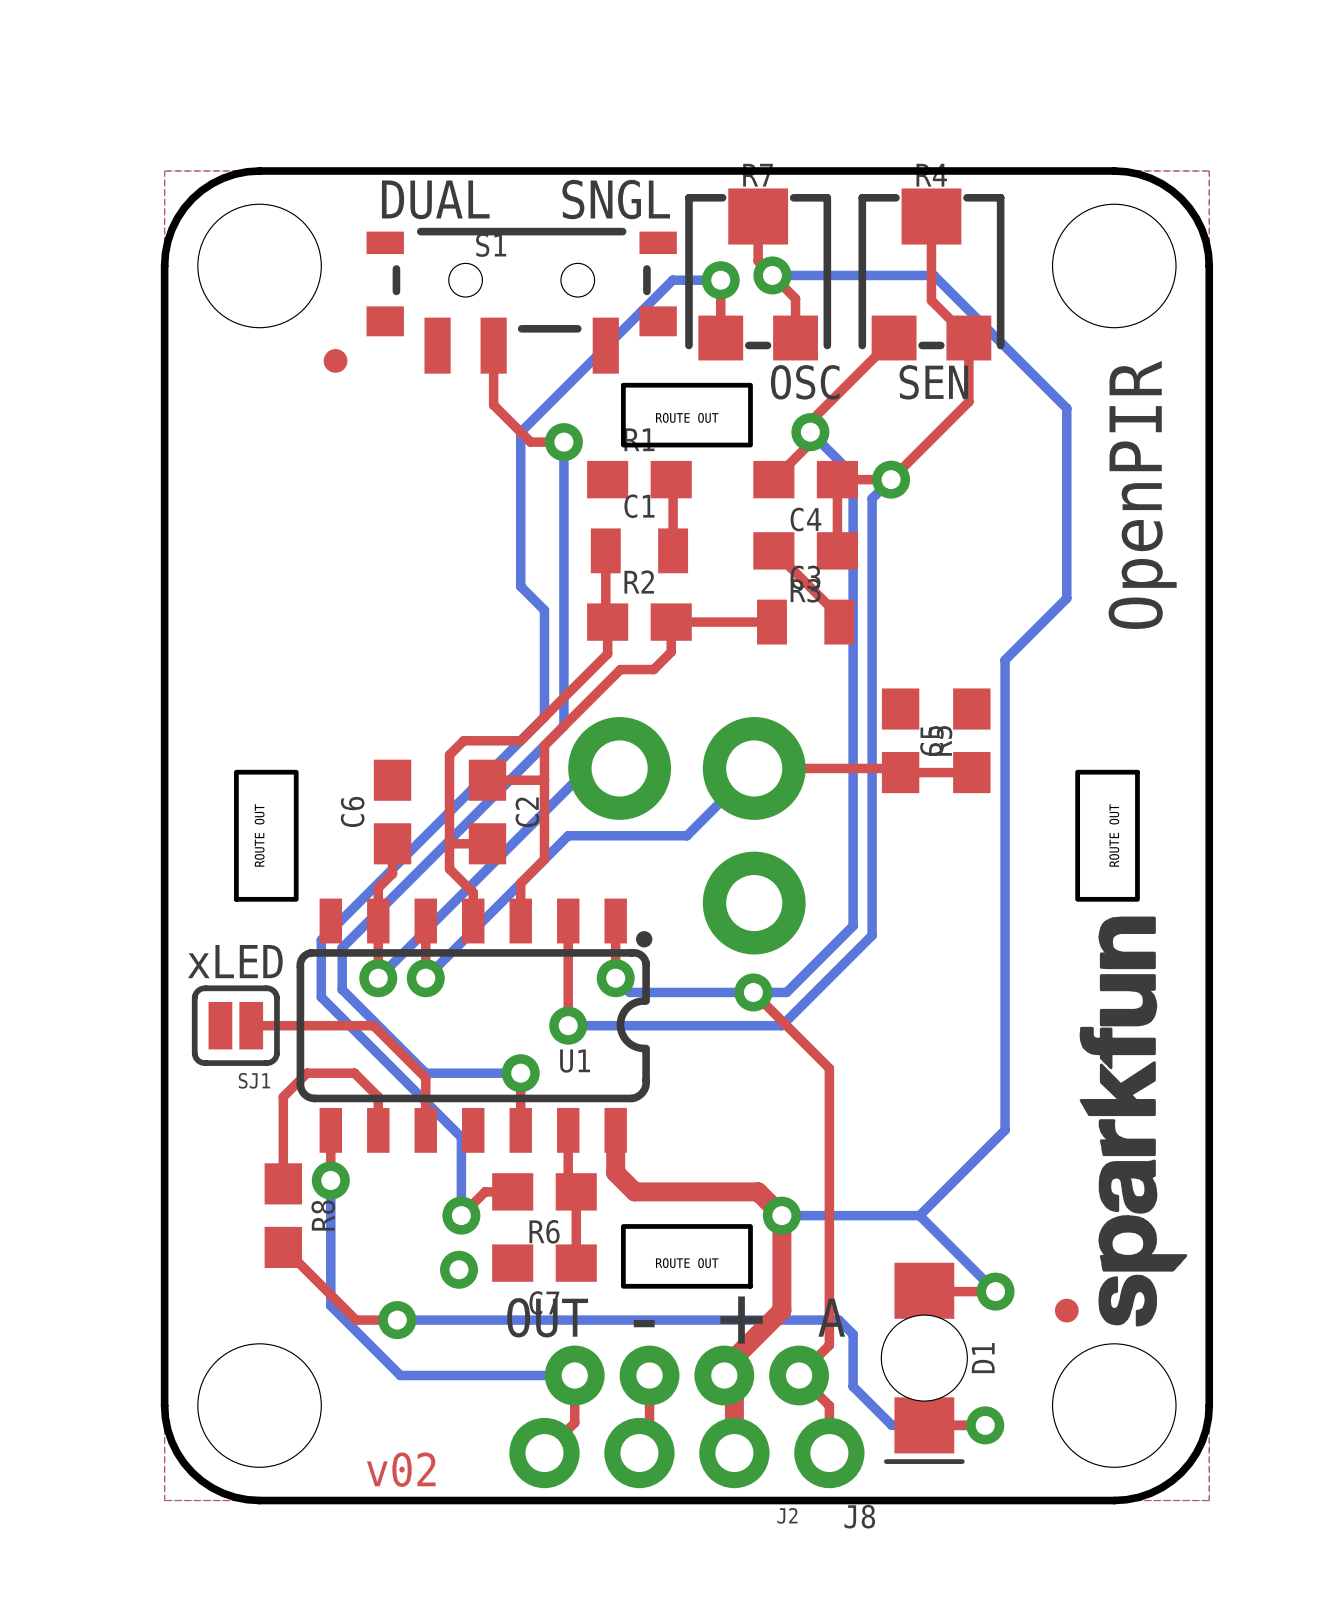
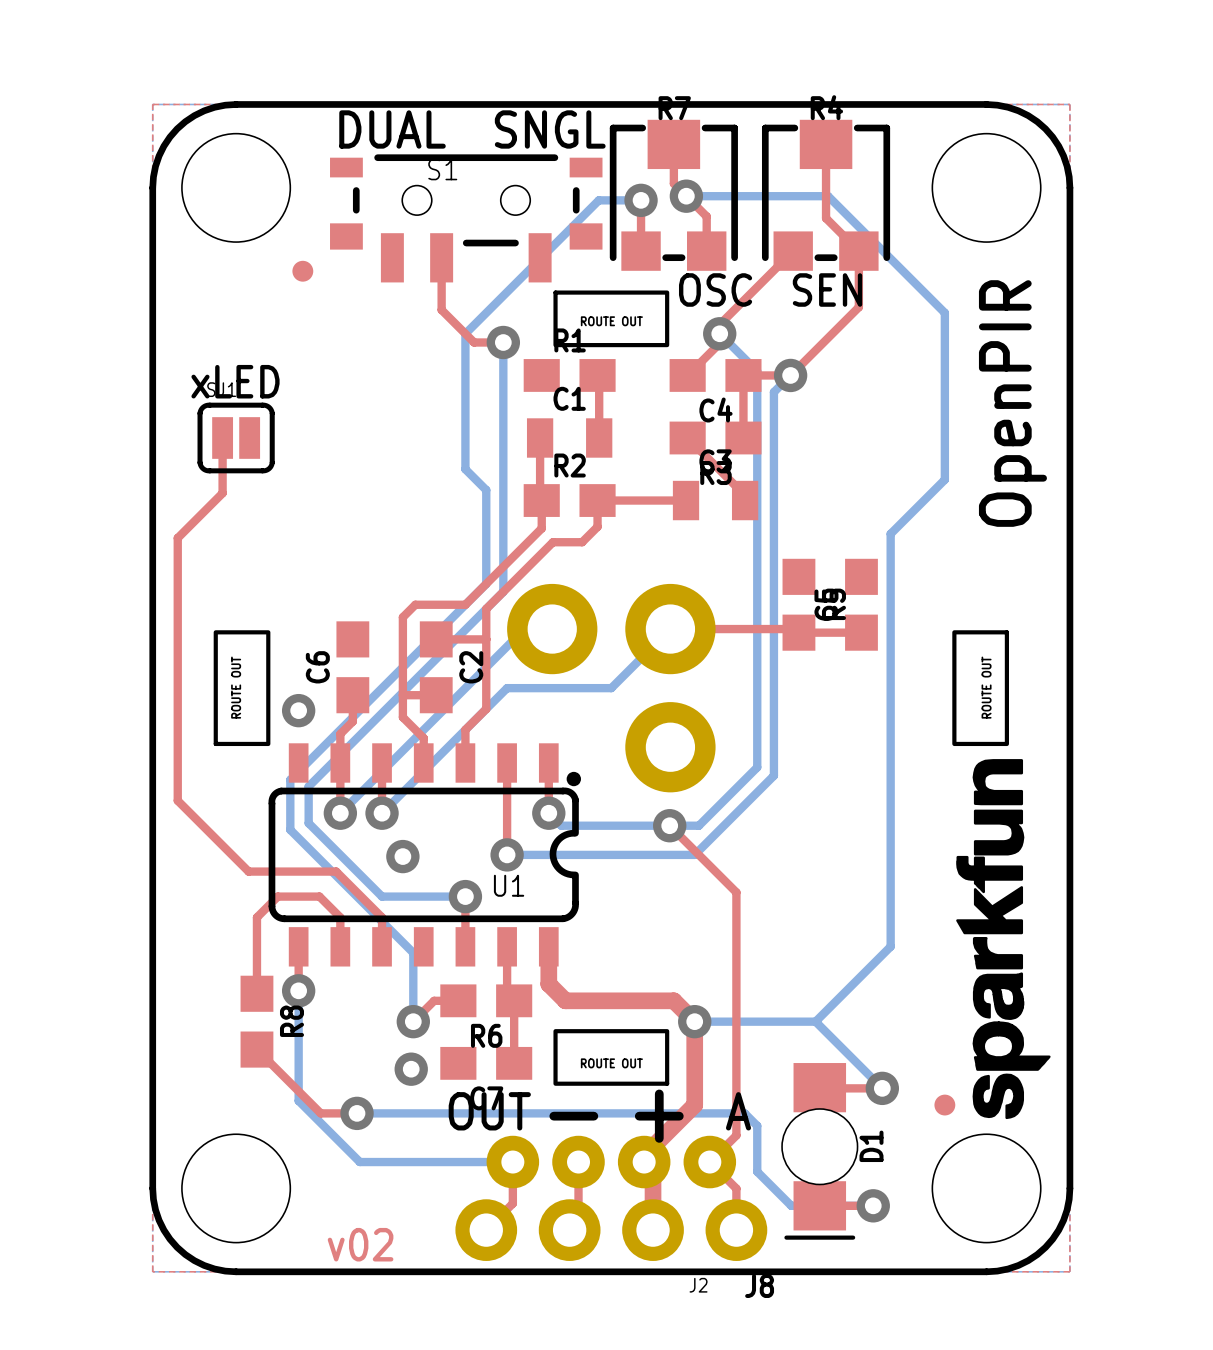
via: none -> (298, 710)
text position: xLED (235, 961) -> xLED (235, 381)
SJ1 rotation: 0° (235, 1025) -> 180° (236, 438)
SJ1 position: (235, 1025) -> (236, 438)
top track: (251, 1025) (373, 1025) (425, 1077) (425, 1096) -> (222, 438) (222, 493) (177, 538) (177, 800) (248, 871) (336, 871) (382, 917)
via: none -> (402, 856)

